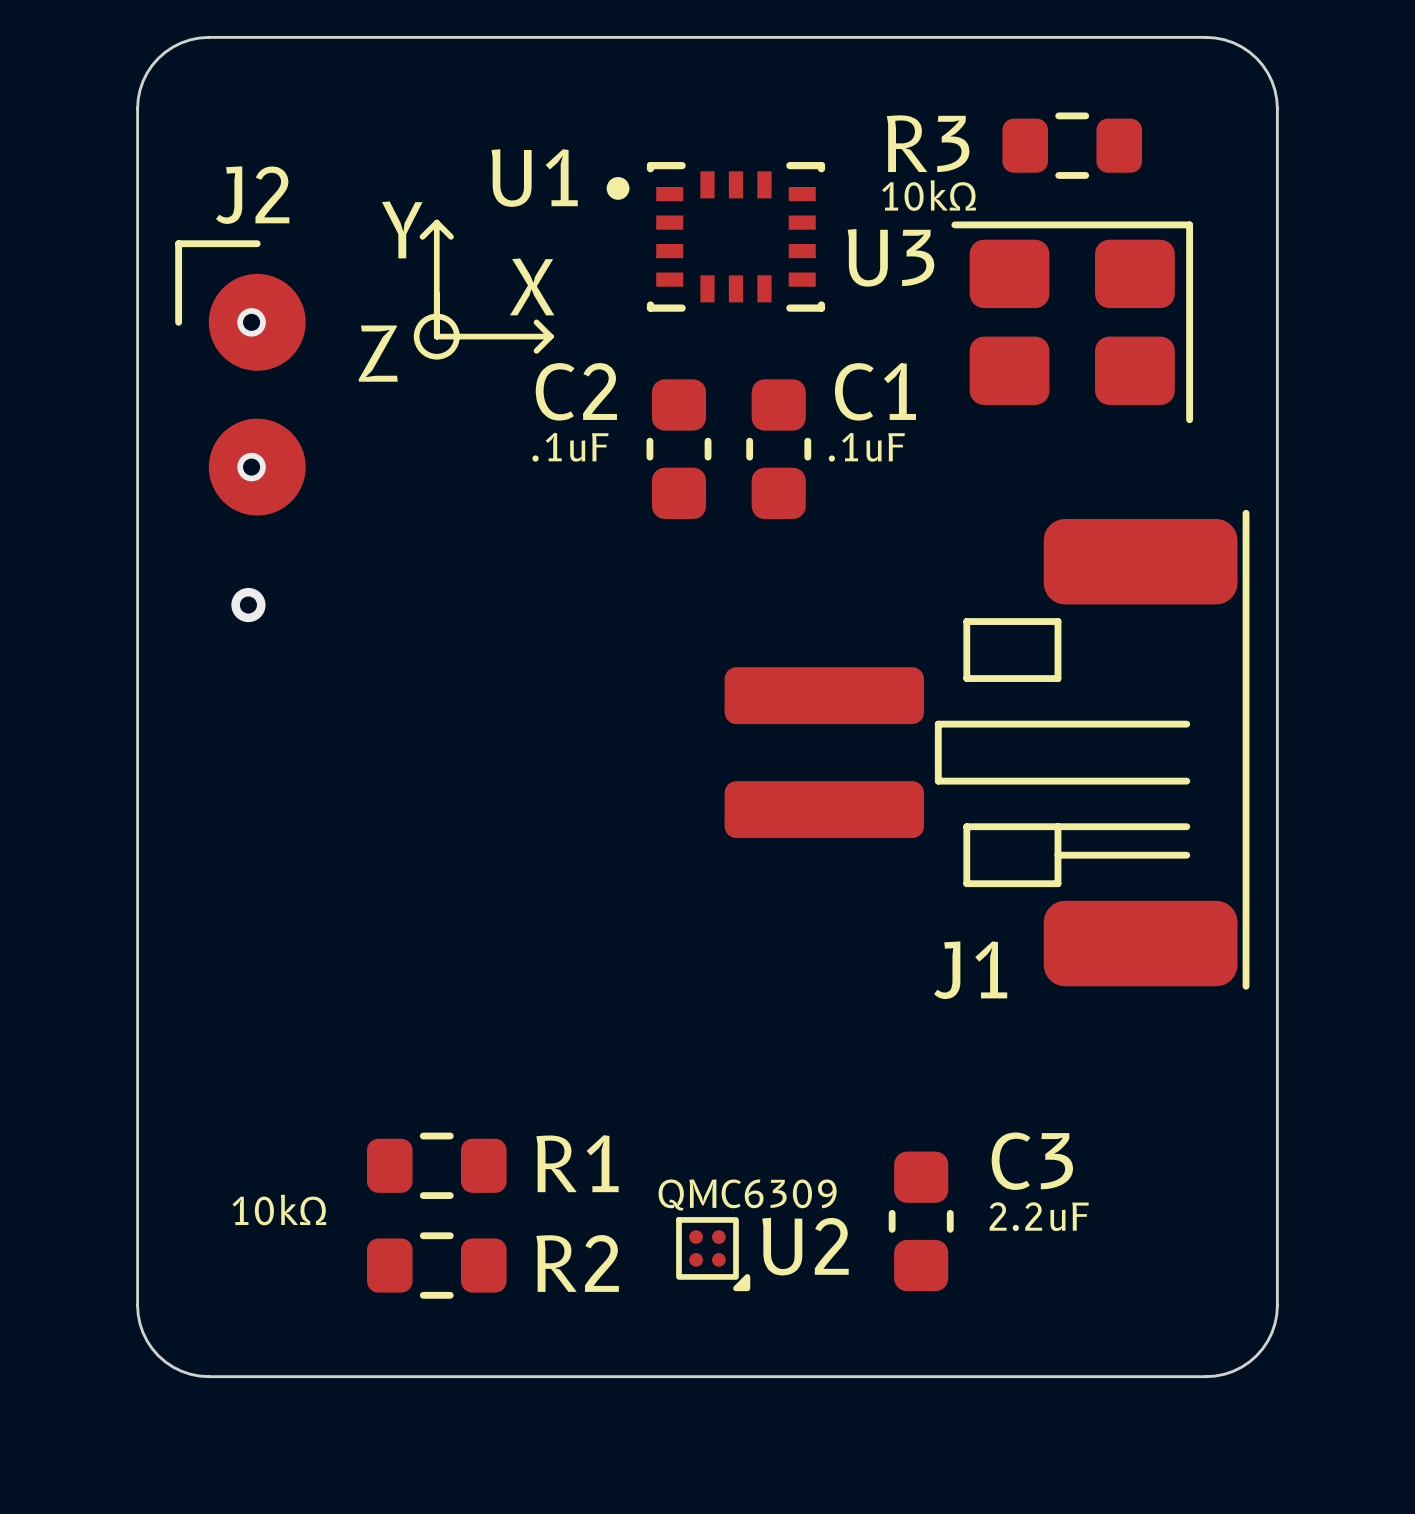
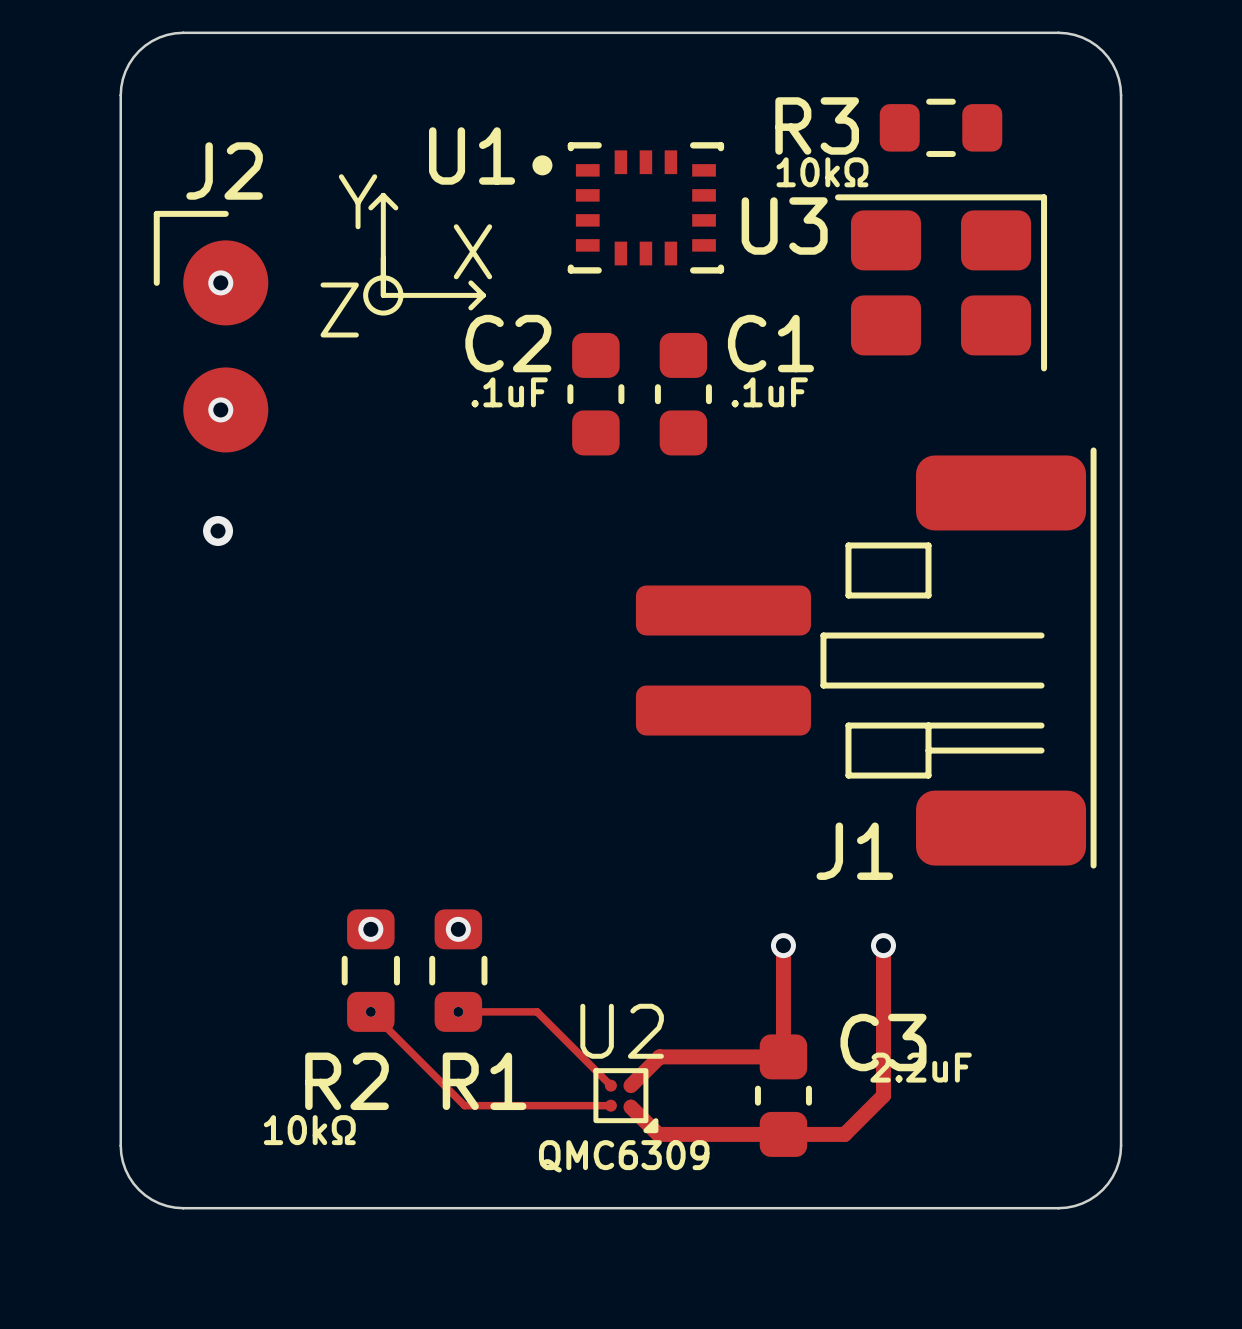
via: none -> (370, 929)
via: none -> (458, 929)
track: none -> (783, 945) (783, 1056) (659, 1056) (630, 1085)
via: none -> (783, 945)
track: none -> (883, 945) (883, 1095) (844, 1134) (658, 1134) (630, 1107)
via: none -> (883, 945)
track: none -> (370, 1011) (464, 1105) (610, 1105)
via: none -> (370, 1011)
track: none -> (458, 1011) (537, 1011) (610, 1085)
via: none -> (458, 1011)
R1 rotation: 0° (436, 1165) -> 90° clockwise (458, 970)
R1 position: (436, 1165) -> (458, 970)
text position: QMC6309 (747, 1195) -> QMC6309 (624, 1156)
text position: 10kΩ (279, 1209) -> 10kΩ (309, 1130)
C3 position: (921, 1221) -> (783, 1095)
U2 name position: U2 (805, 1246) -> U2 (622, 1031)
R2 rotation: 0° (436, 1265) -> 90° clockwise (370, 970)
R2 position: (436, 1265) -> (370, 970)

